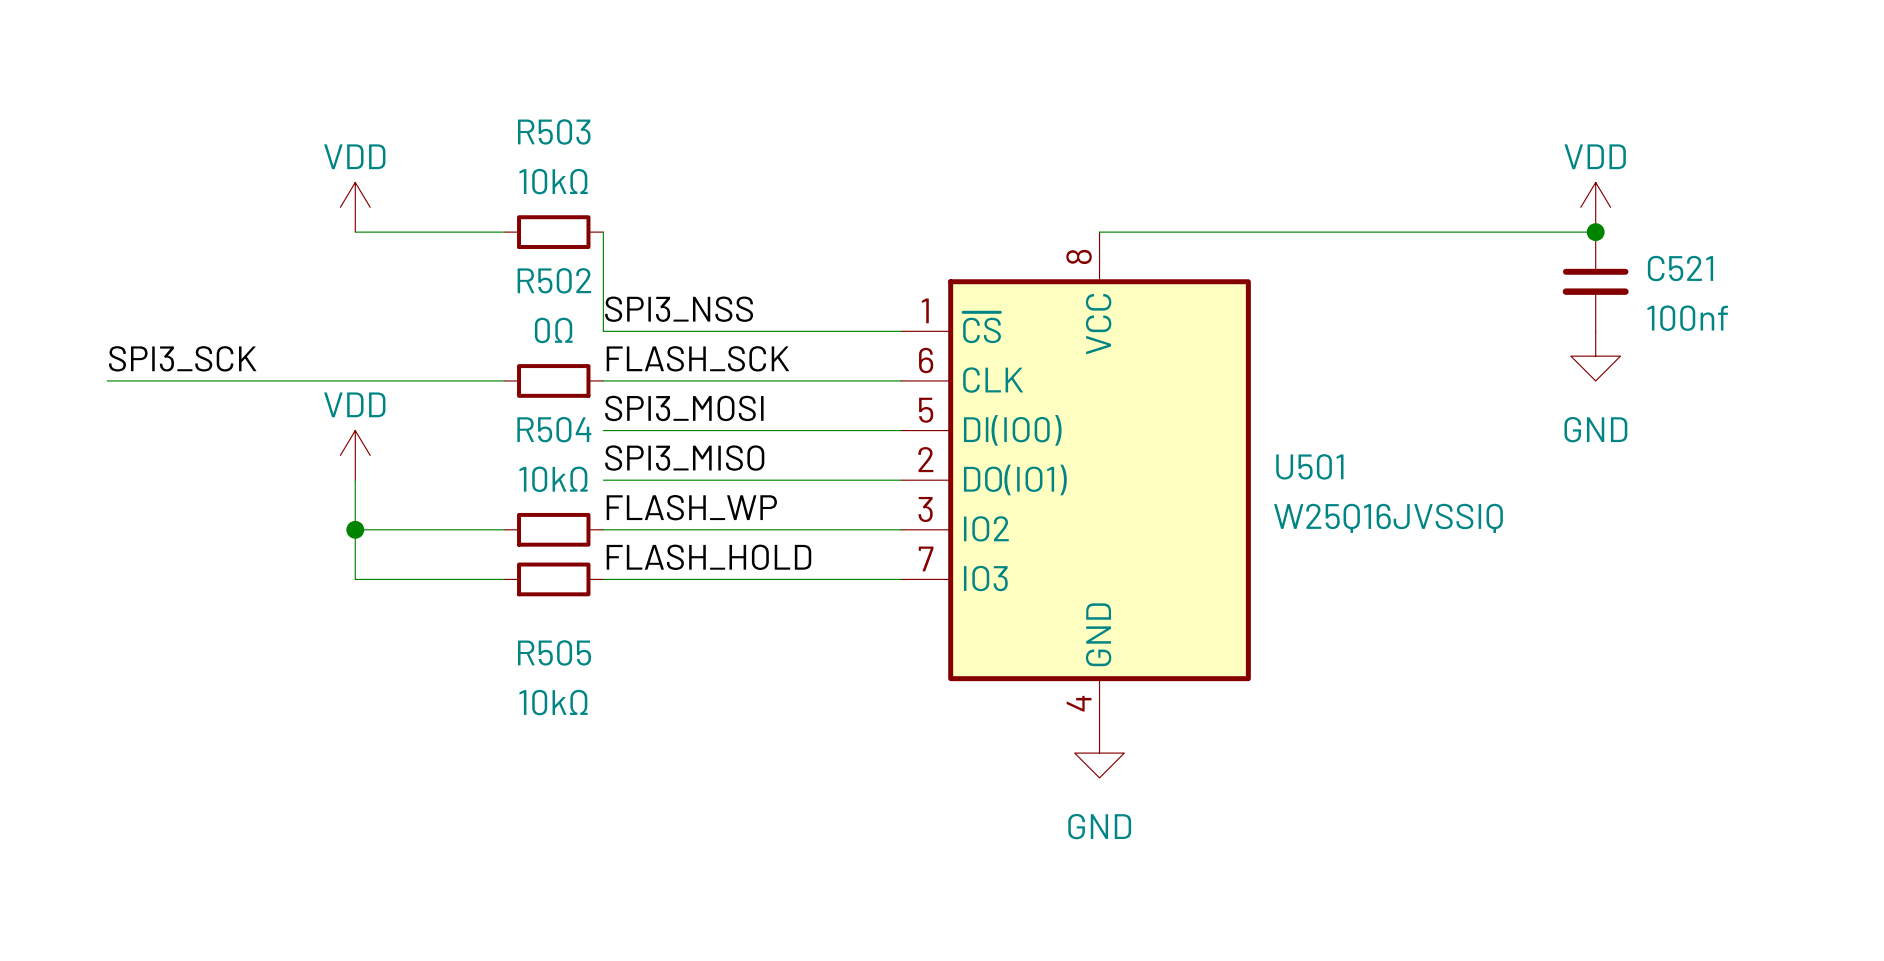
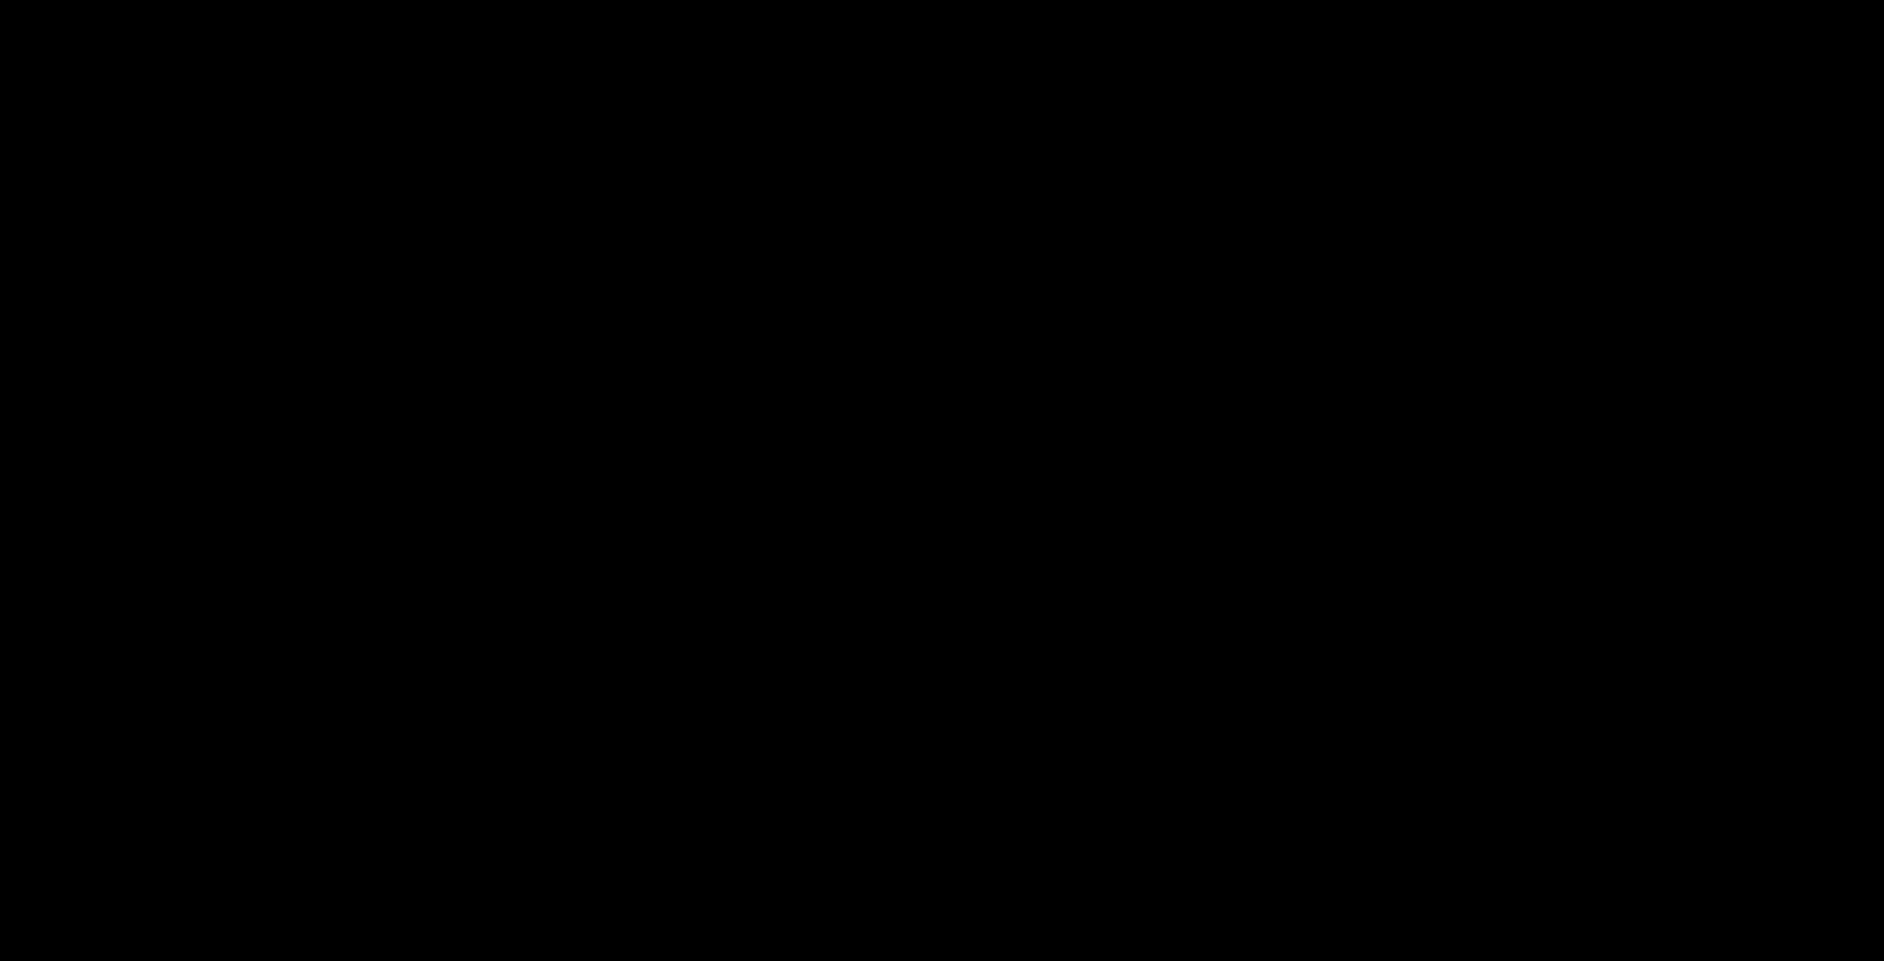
power symbol: VDD (355, 207) -> none
power symbol: VDD (1595, 207) -> none
wire: (355, 232) (504, 232) -> none
R503: (553, 232) -> none
wire: (603, 232) (603, 331) (901, 331) -> none
wire: (1099, 232) (1595, 232) -> none
junction: (1595, 232) -> none
C521: (1595, 281) -> none
label: SPI3_NSS (679, 309) -> none
power symbol: GND (1595, 356) -> none
label: SPI3_SCK (182, 358) -> none
label: FLASH_SCK (697, 358) -> none
wire: (107, 380) (504, 380) -> none
R502: (553, 380) -> none
wire: (603, 380) (901, 380) -> none
label: SPI3_MOSI (684, 408) -> none
wire: (603, 430) (901, 430) -> none
power symbol: VDD (355, 455) -> none
label: SPI3_MISO (684, 458) -> none
wire: (355, 480) (355, 579) (504, 579) -> none
wire: (603, 480) (901, 480) -> none
U501: W25Q16JVSSIQ (1075, 480) -> none
label: FLASH_WP (691, 507) -> none
wire: (355, 529) (504, 529) -> none
junction: (355, 529) -> none
R504: (553, 529) -> none
wire: (603, 529) (901, 529) -> none
label: FLASH_HOLD (708, 557) -> none
R505: (553, 579) -> none
wire: (603, 579) (901, 579) -> none
power symbol: GND (1099, 753) -> none

